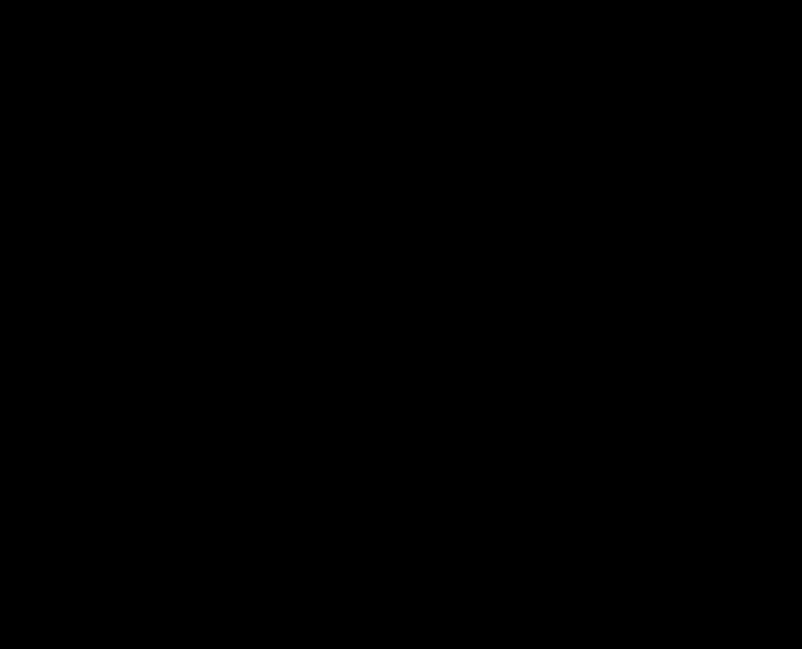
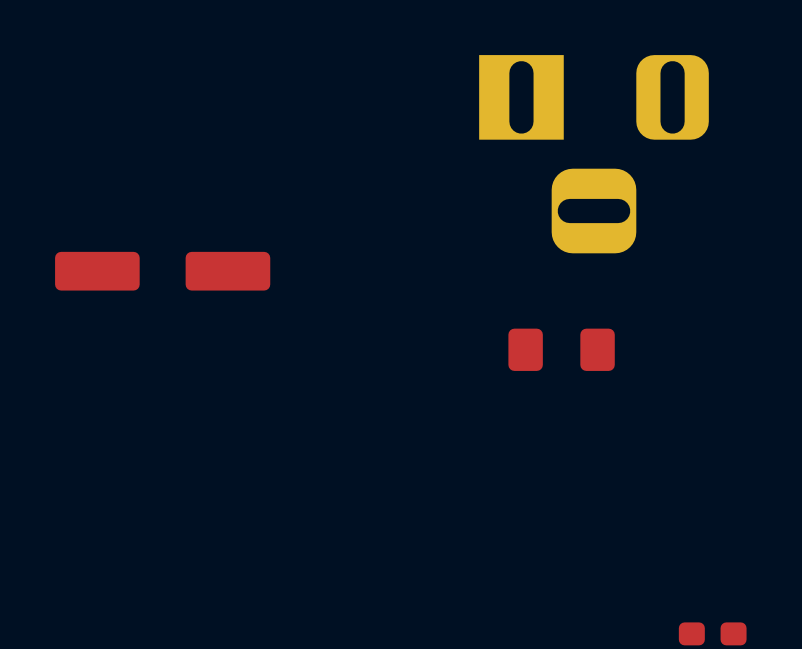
part: none -> (593, 154)
part: none -> (162, 271)
part: none -> (561, 349)
part: none -> (712, 633)

